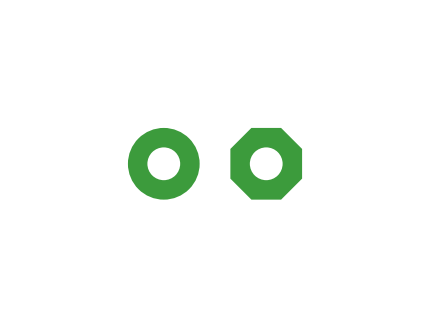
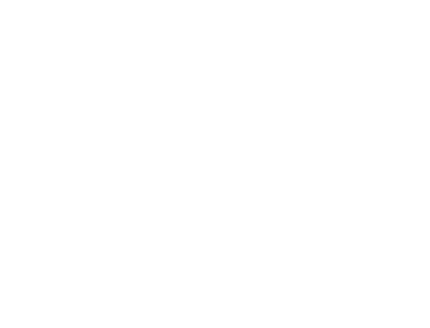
part: (215, 163) -> none

